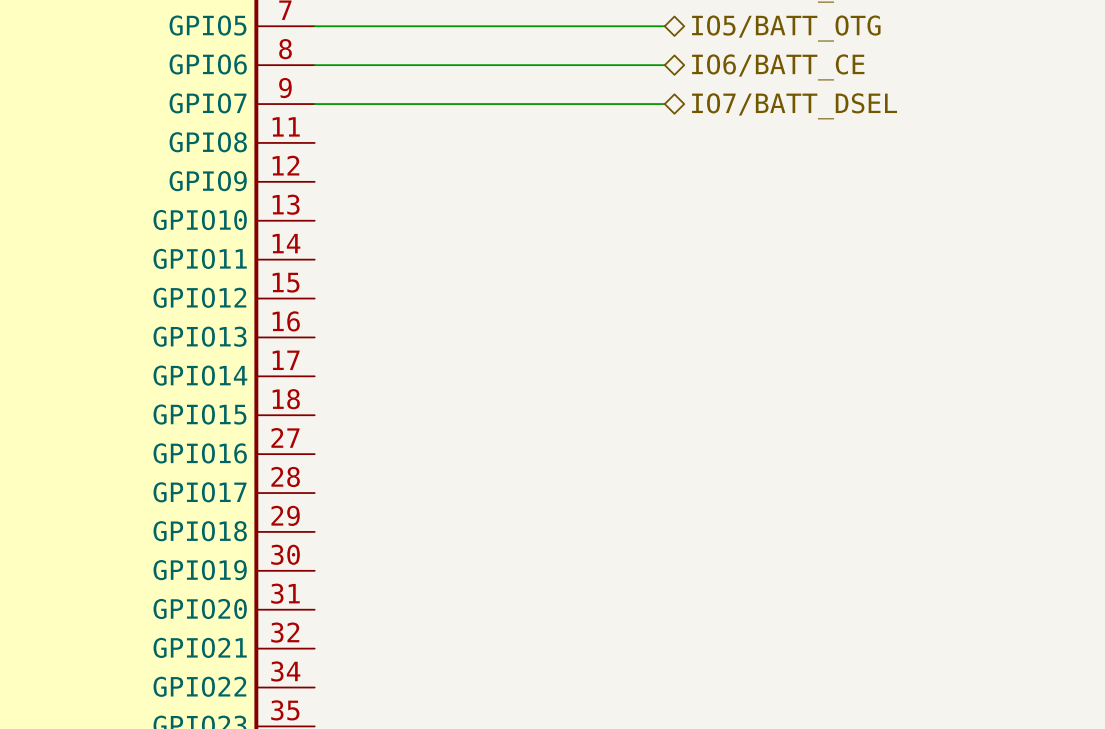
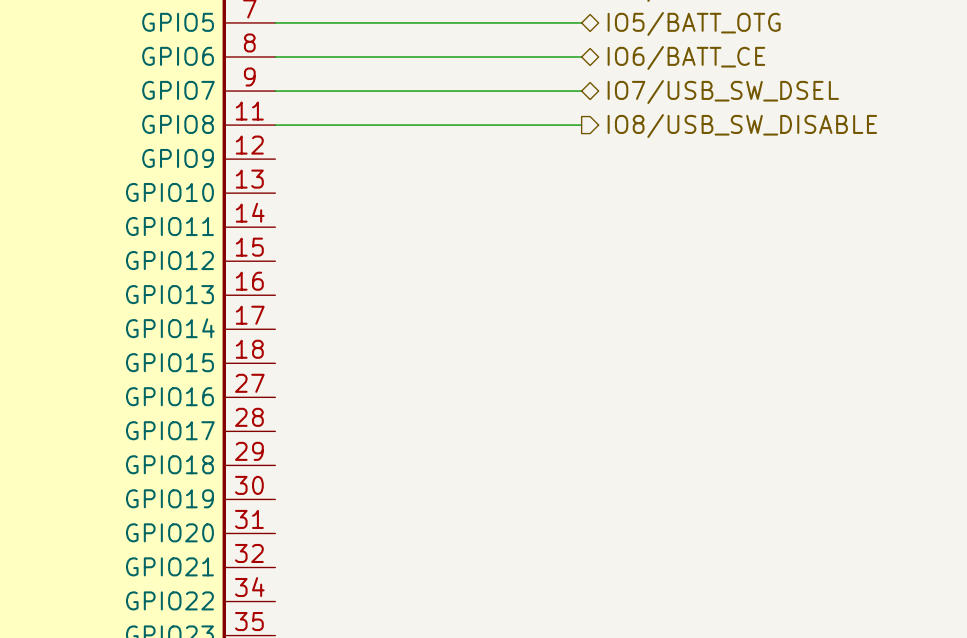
hierarchical label: IO7/BATT_DSEL (794, 106) -> IO7/USB_SW_DSEL (723, 92)
wire: none -> (275, 125) (581, 125)
hierarchical label: none -> IO8/USB_SW_DISABLE (742, 126)

